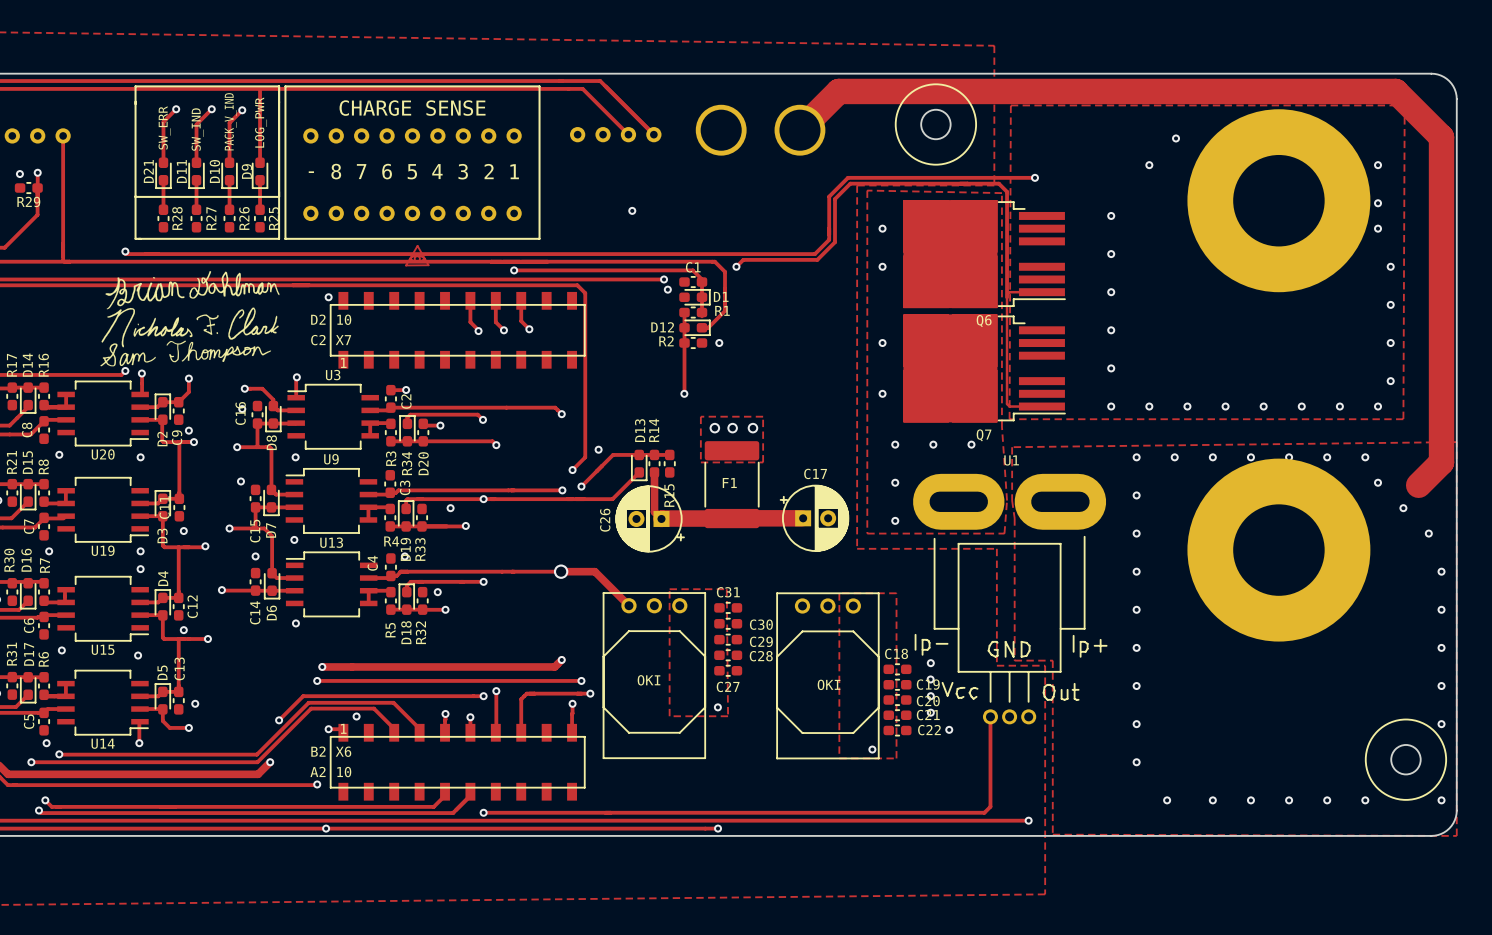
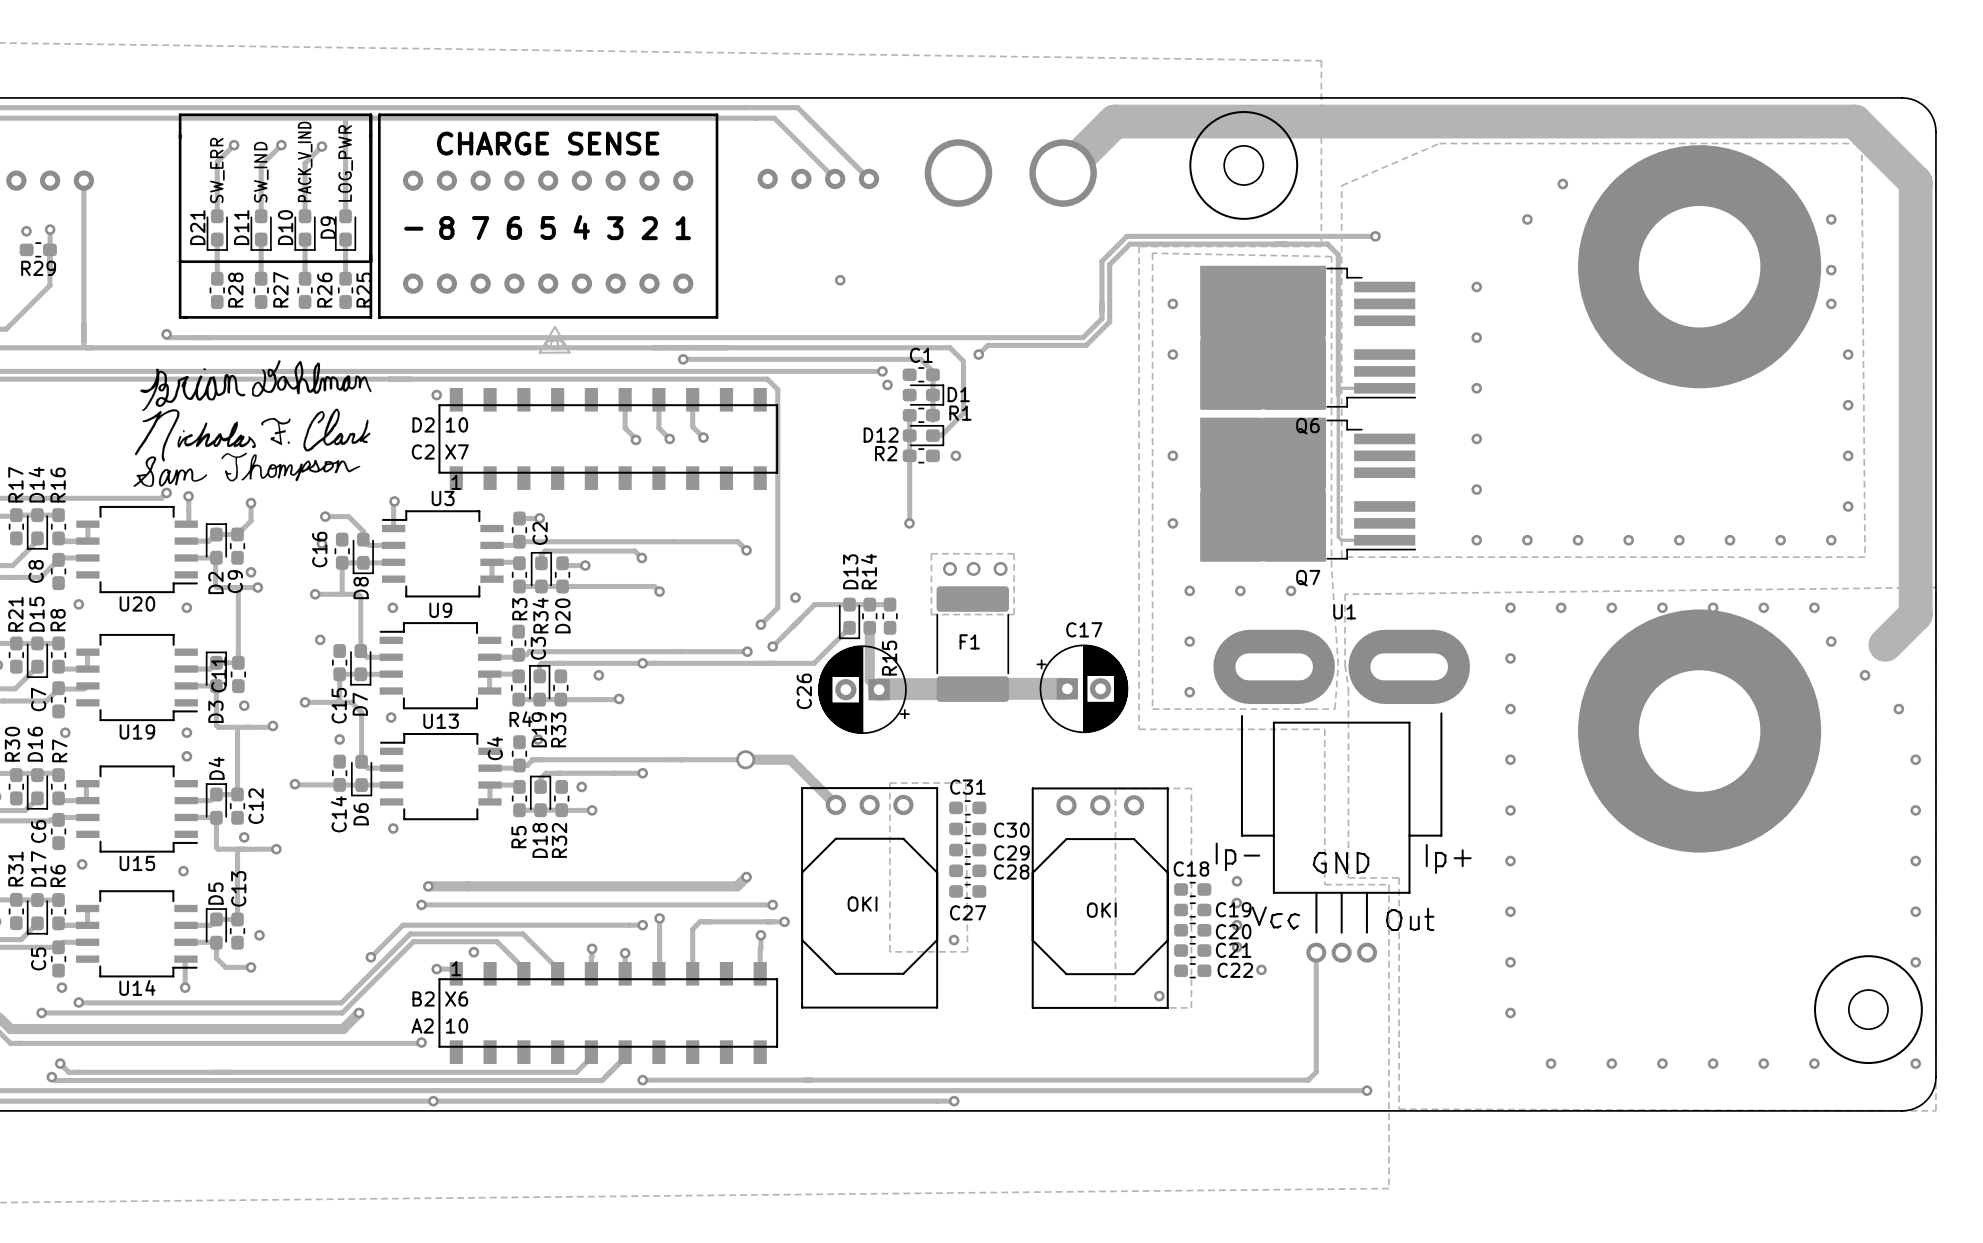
zone outline: (1009, 419) (1010, 105) (1404, 105) (1403, 419) -> (1341, 557) (1341, 185) (1439, 143) (1861, 143) (1865, 557)

